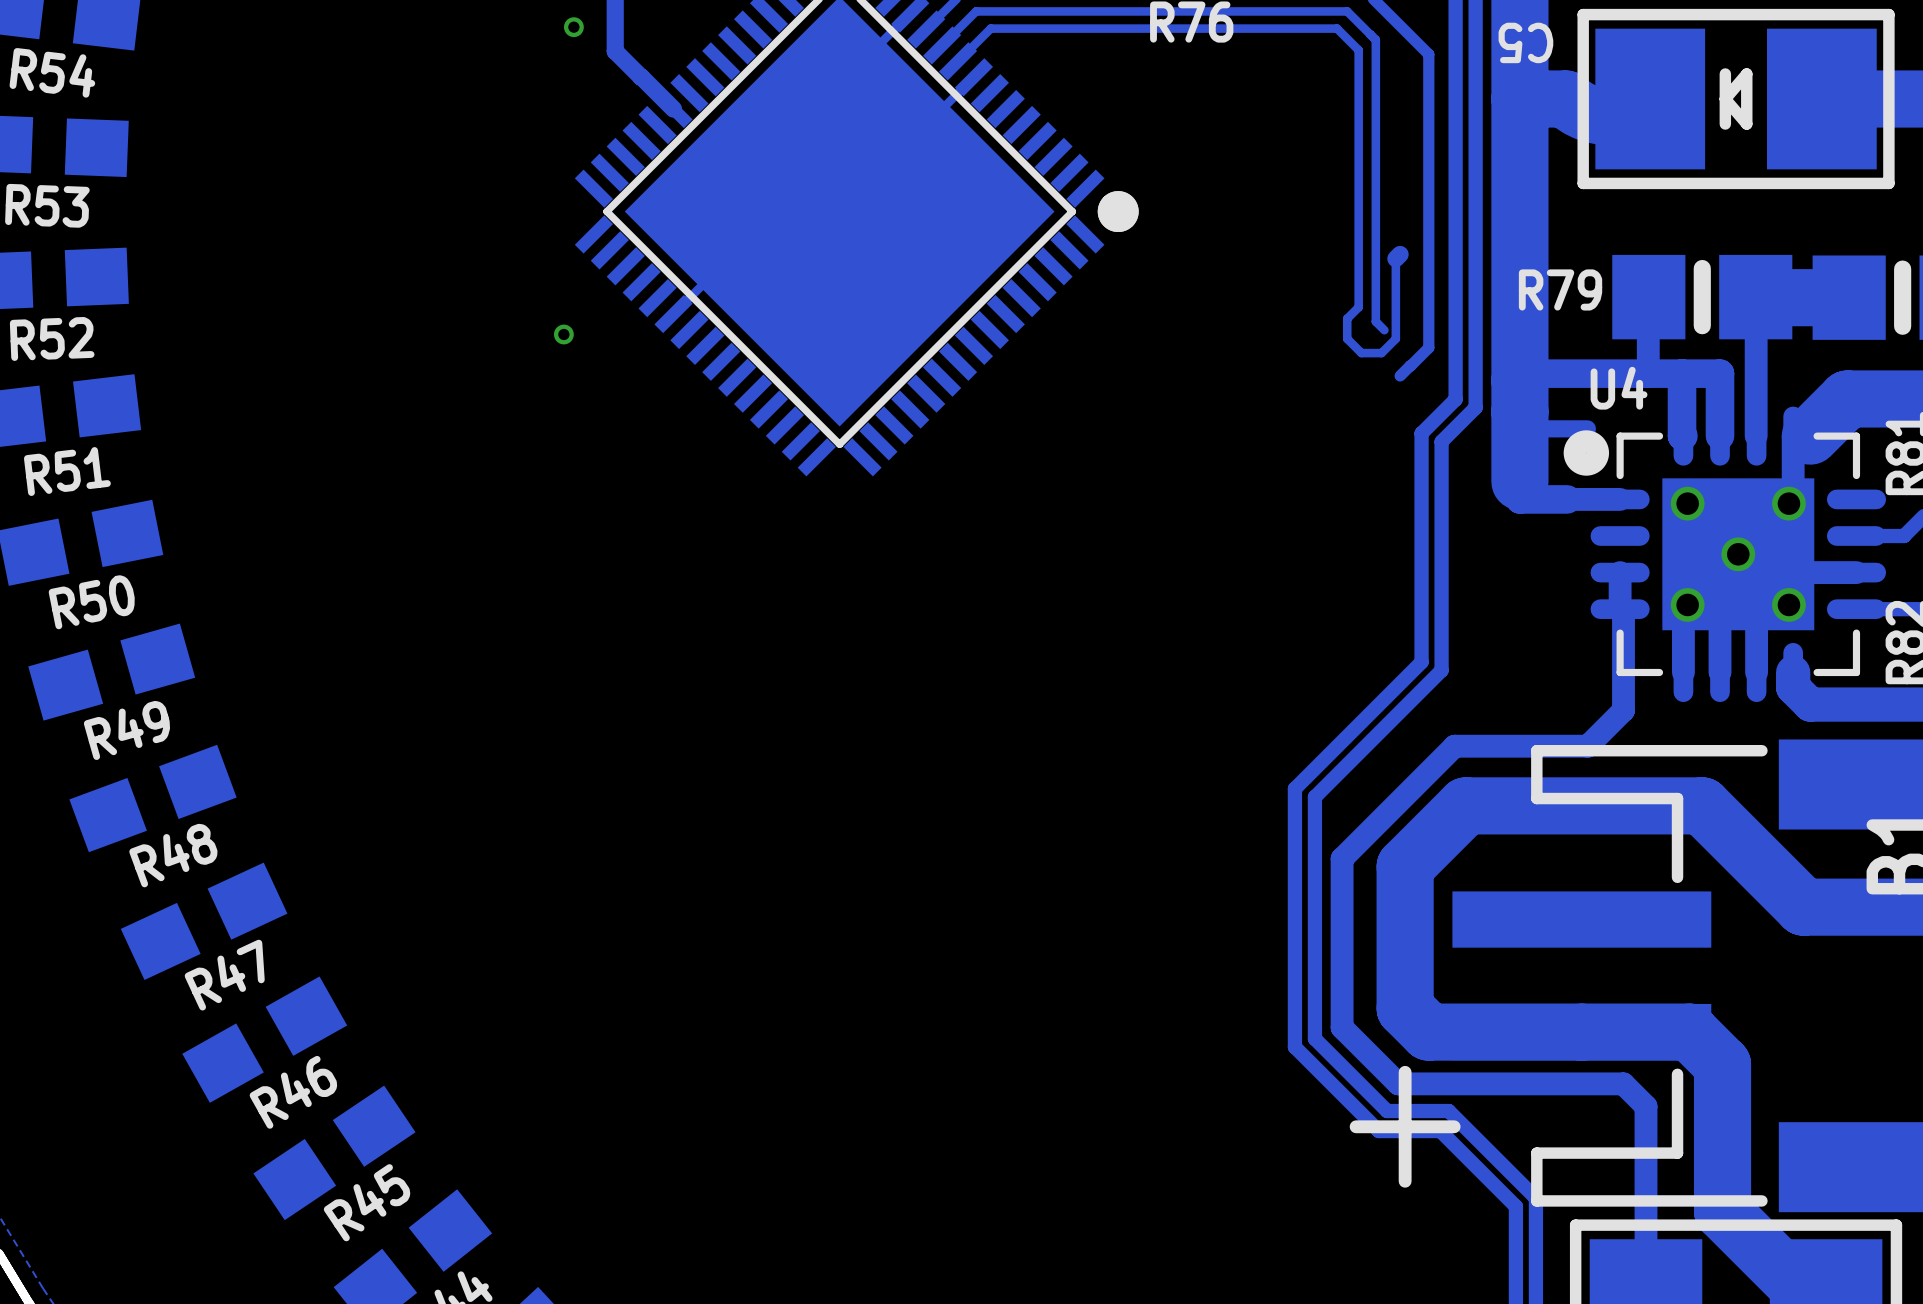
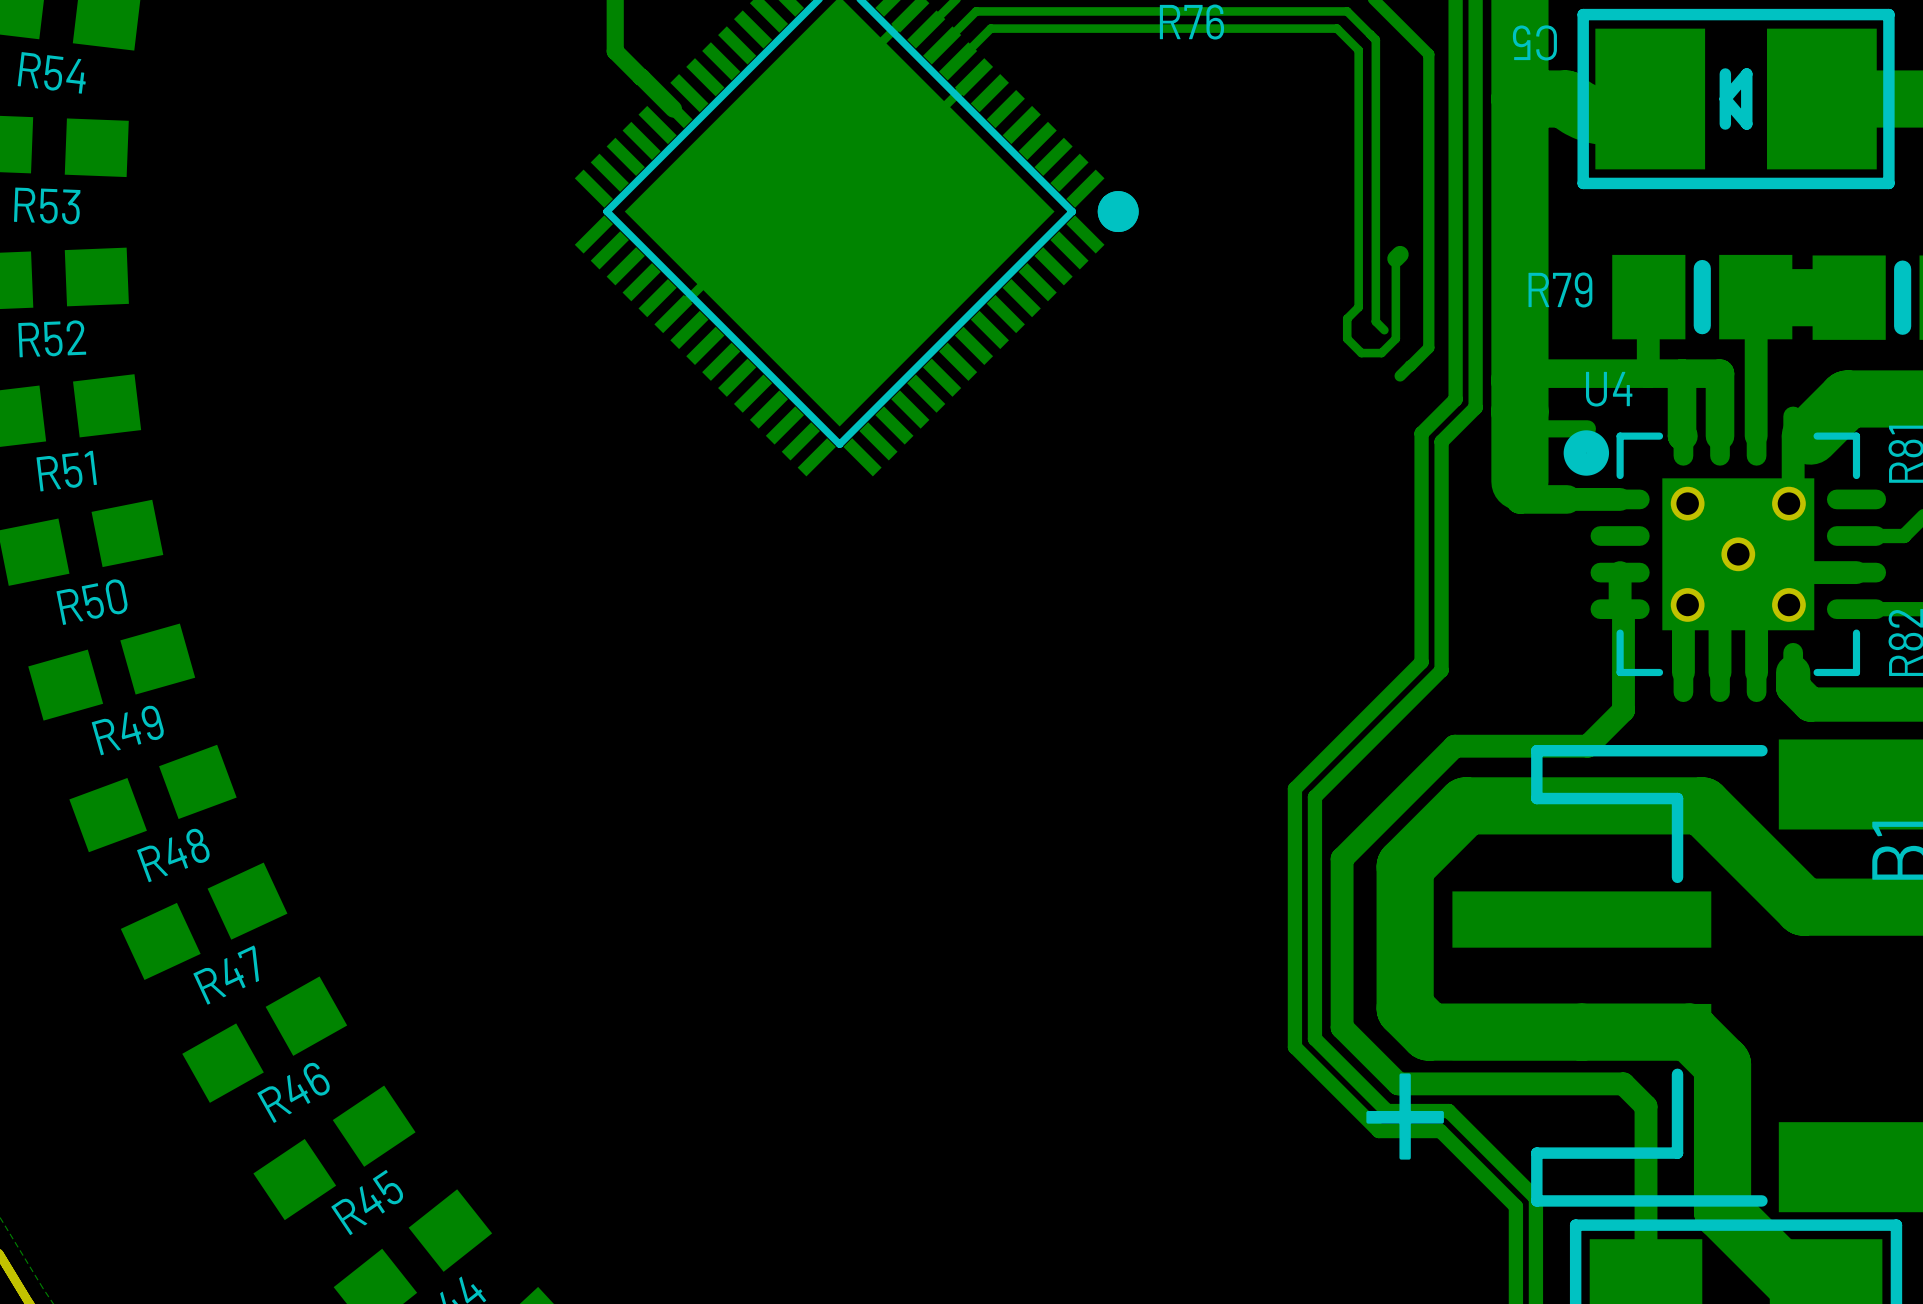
via: (573, 27) -> none
via: (563, 334) -> none

